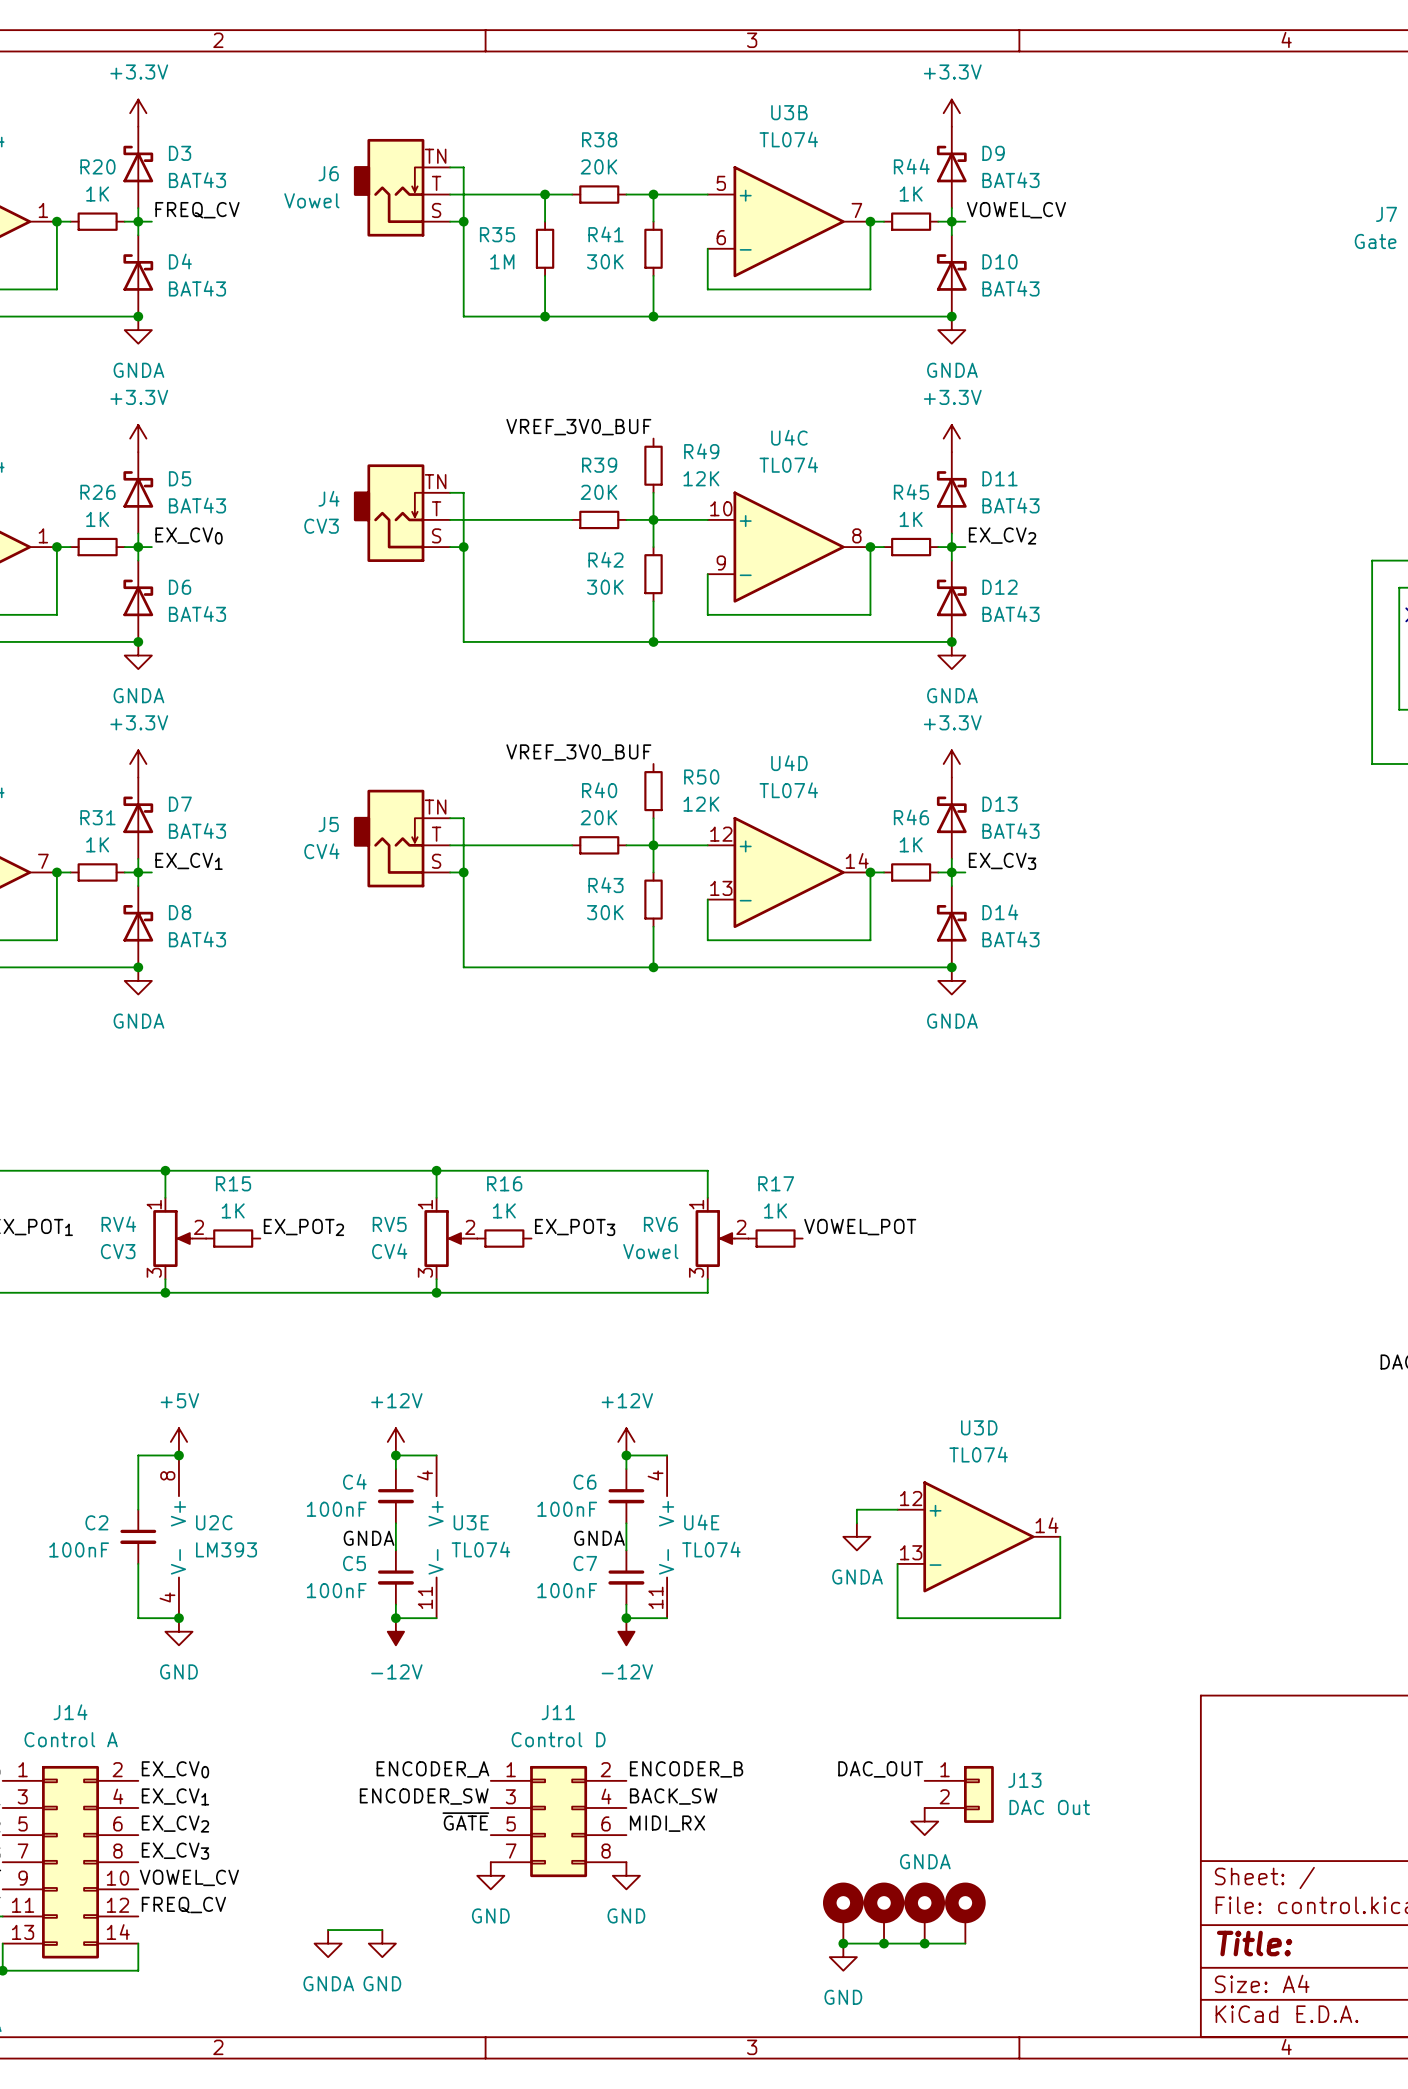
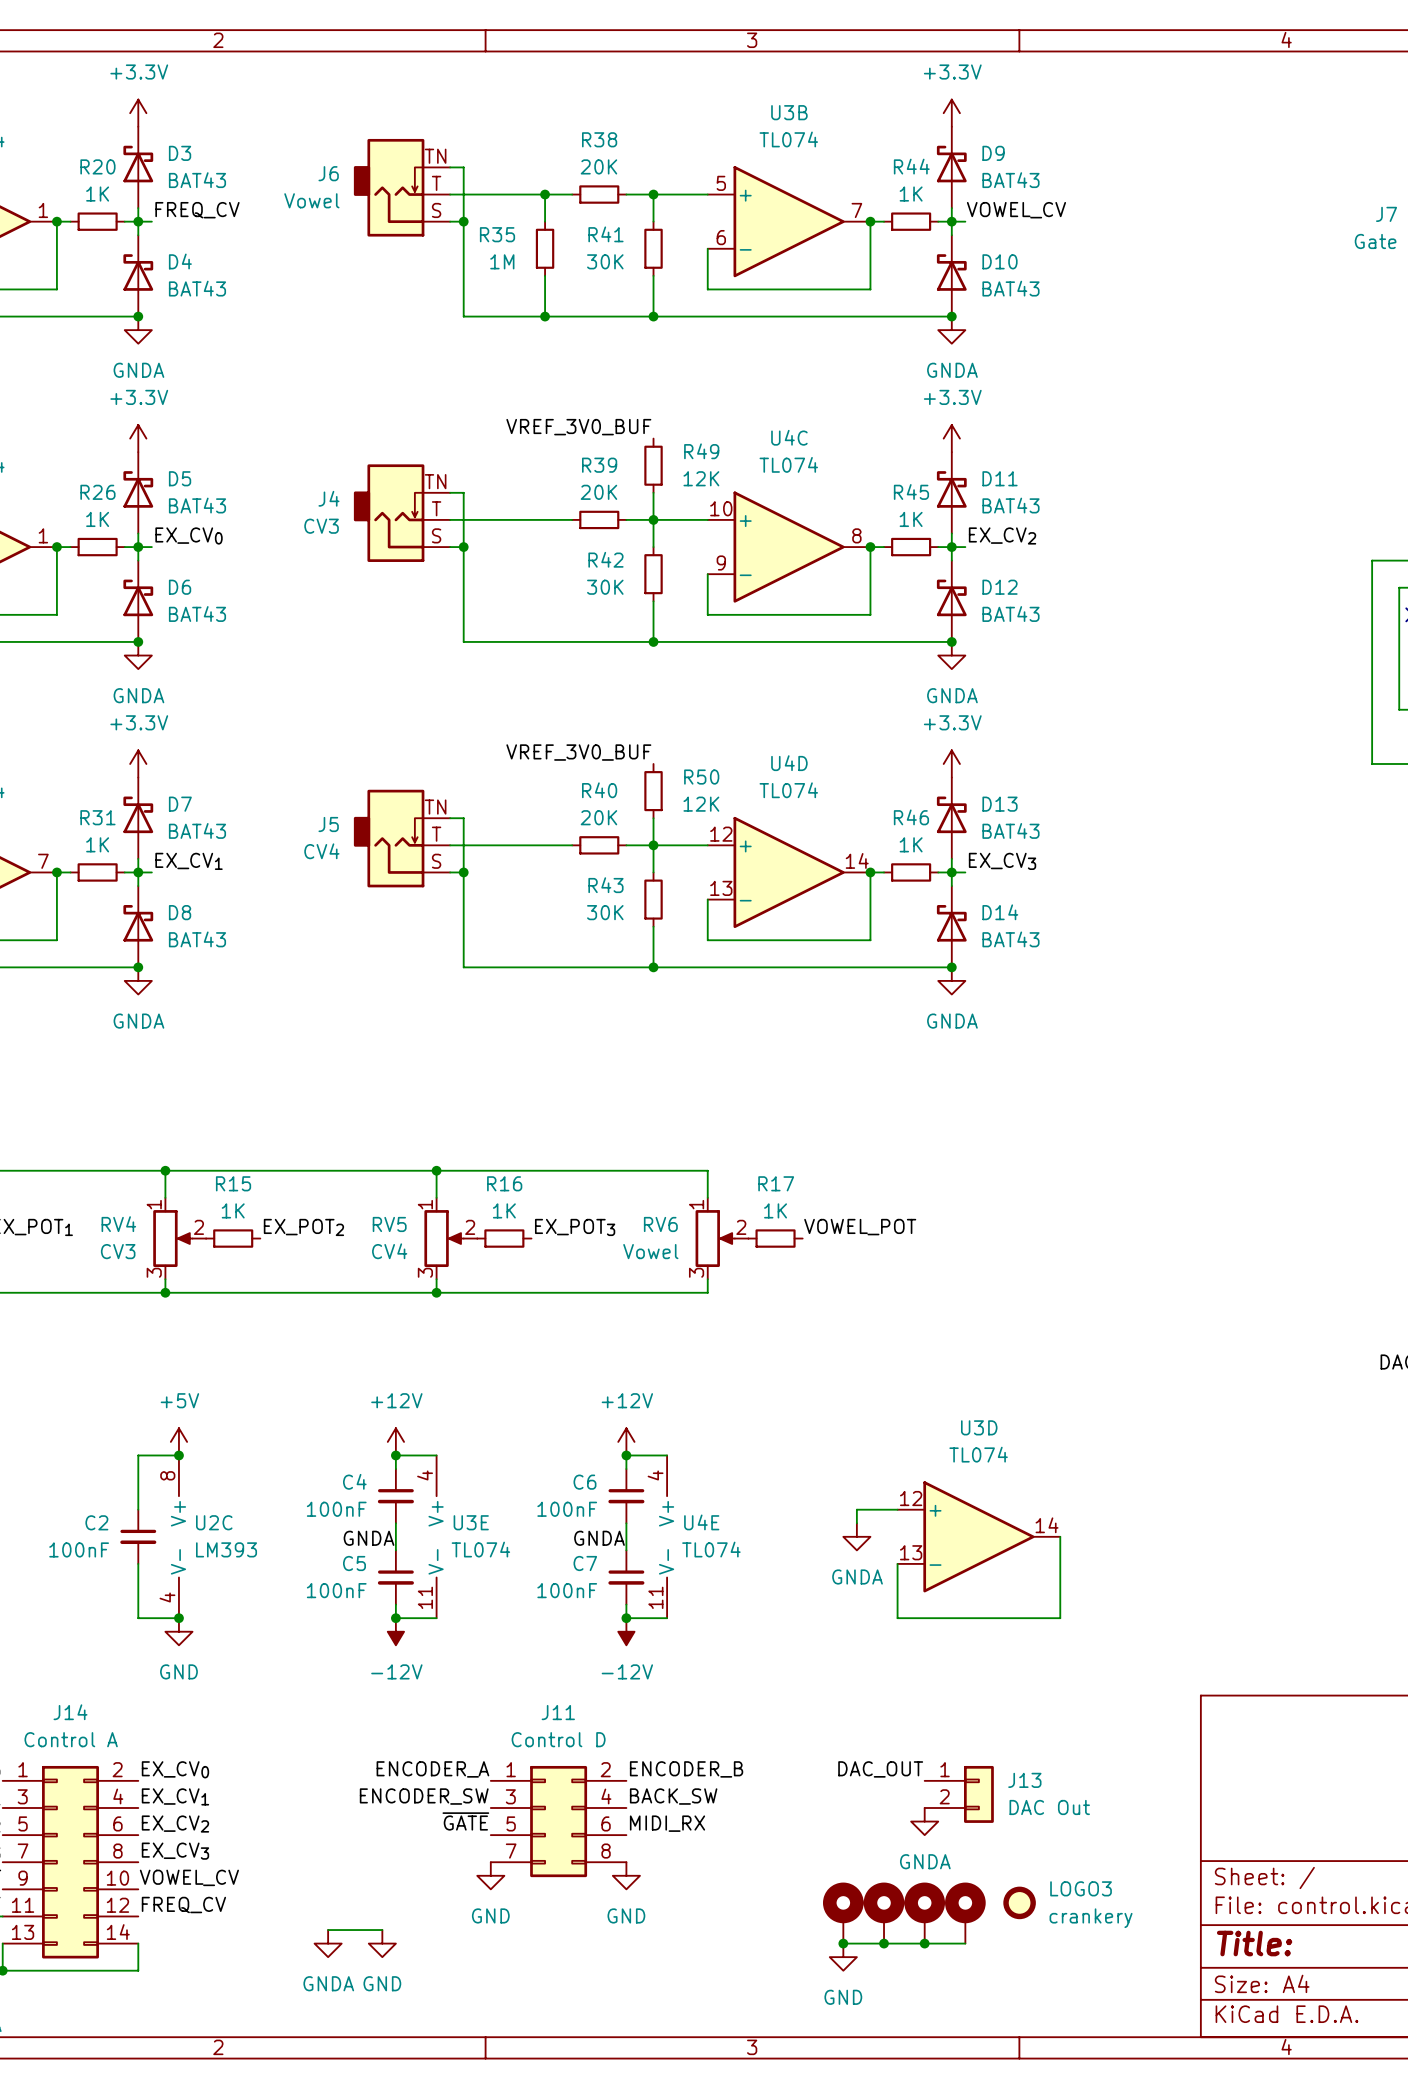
LOGO3: none -> crankery (1019, 1902)

